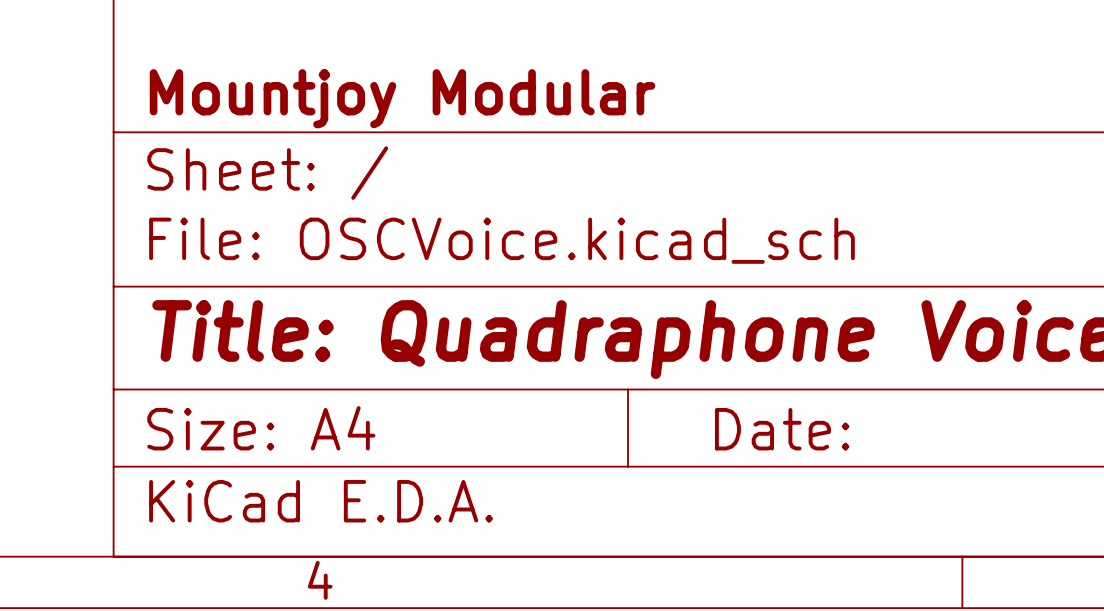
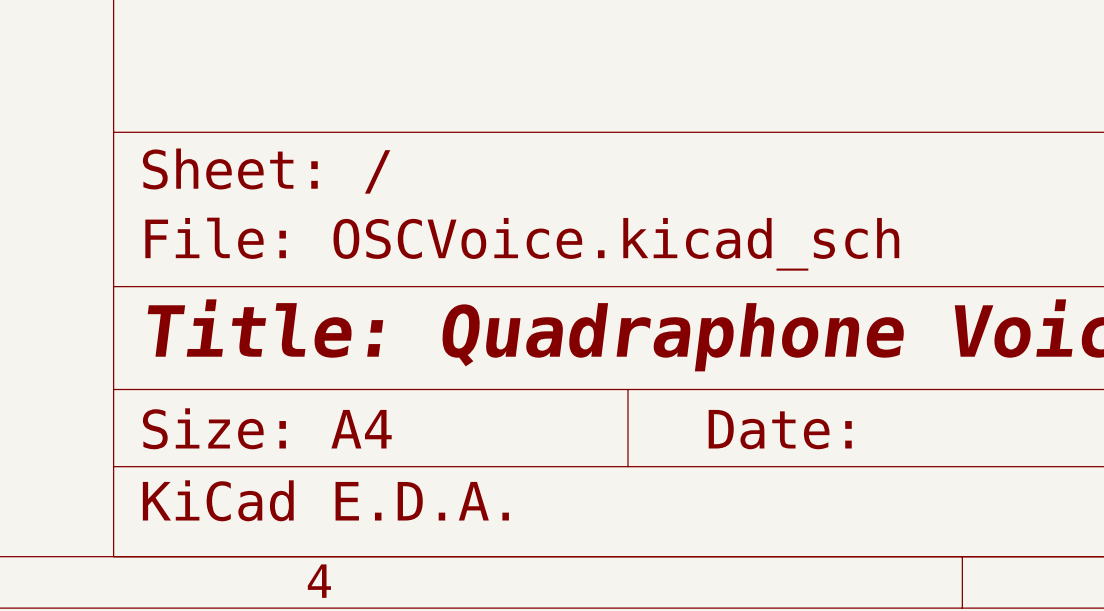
title block: Mountjoy Modular (402, 98) -> none

